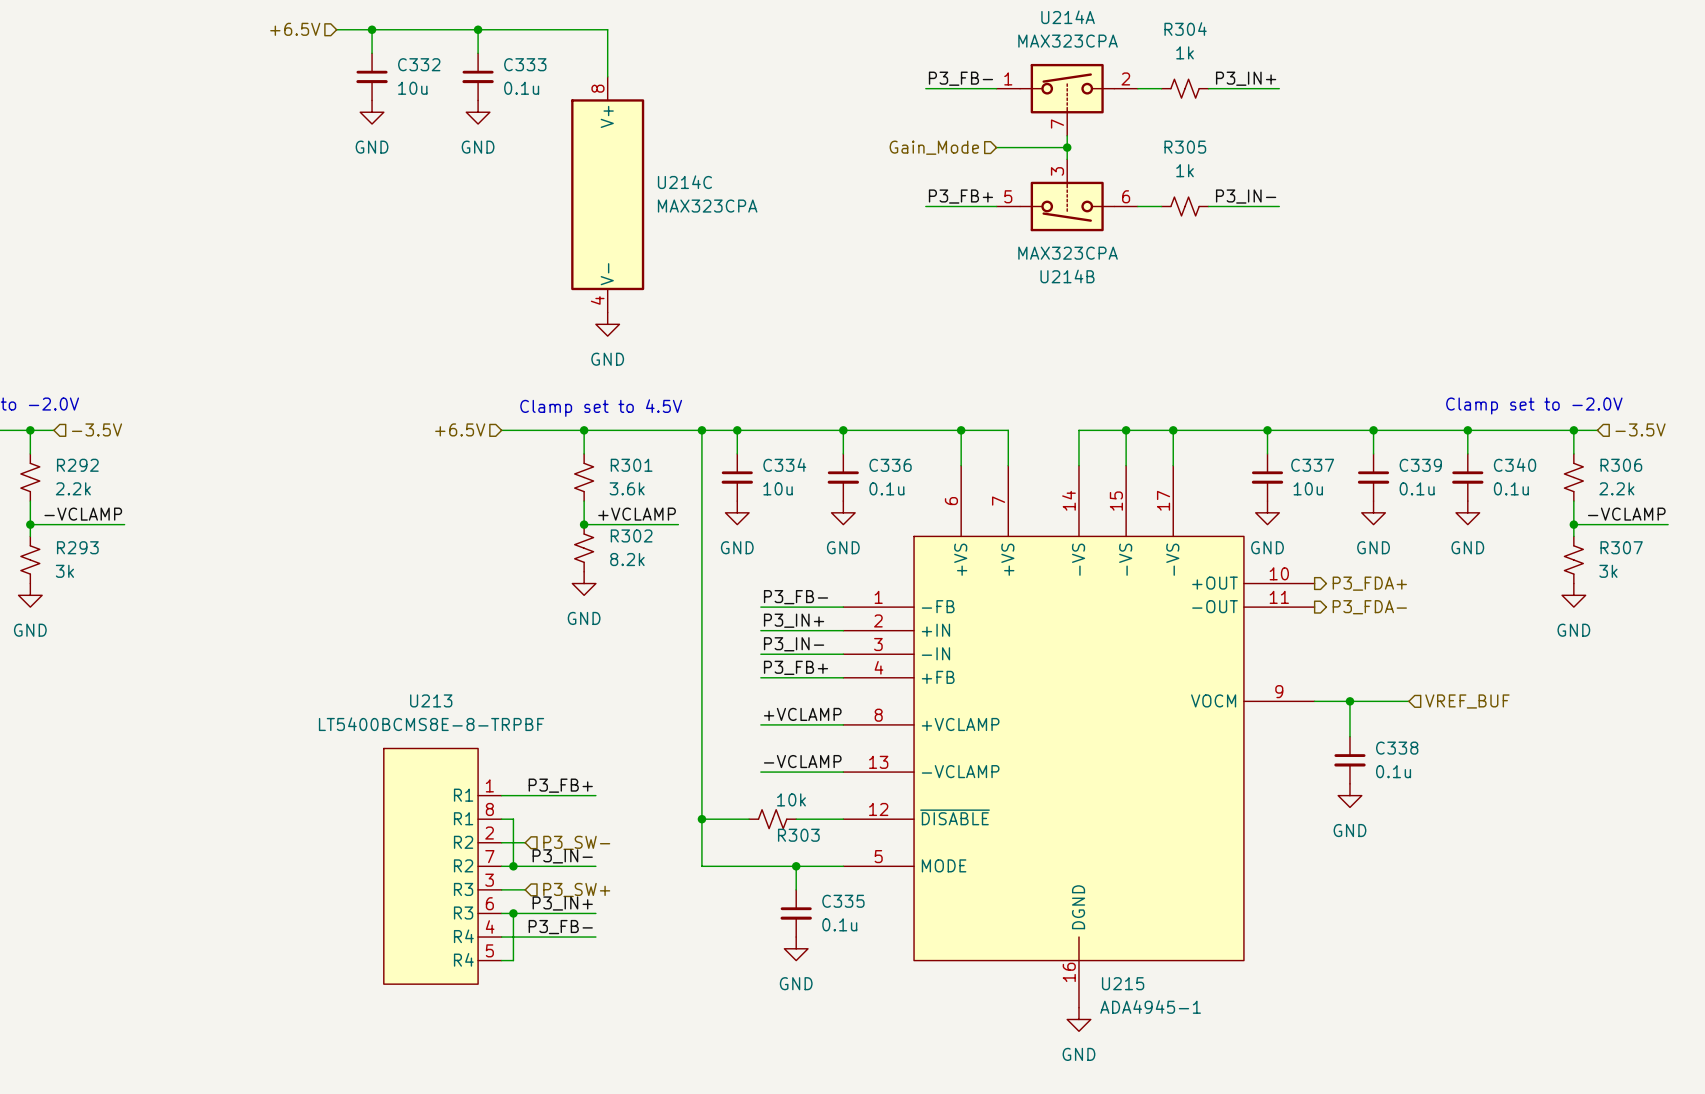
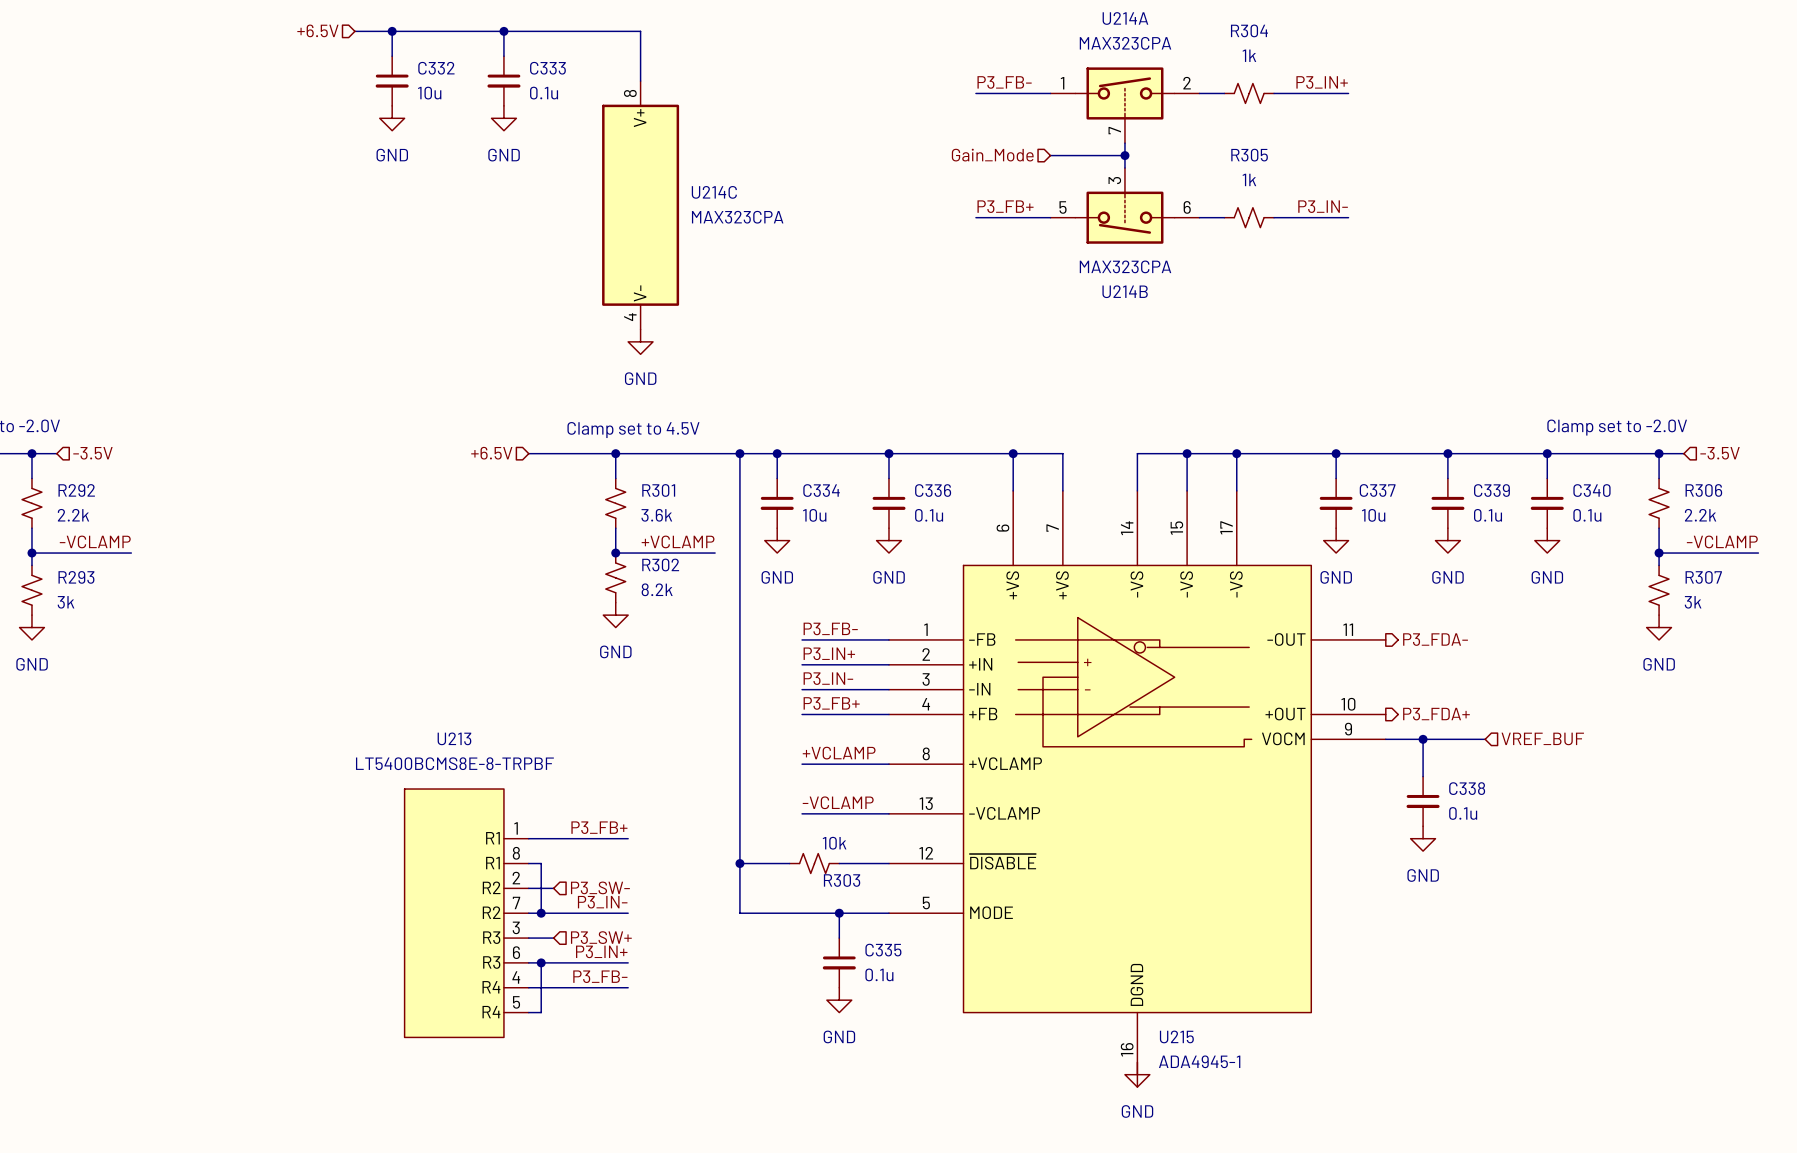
U215 symbol: [843, 465, 1315, 1008] -> [888, 490, 1386, 1088]
hierarchical label position: P3_FDA+ (1369, 583) -> P3_FDA+ (1436, 714)

